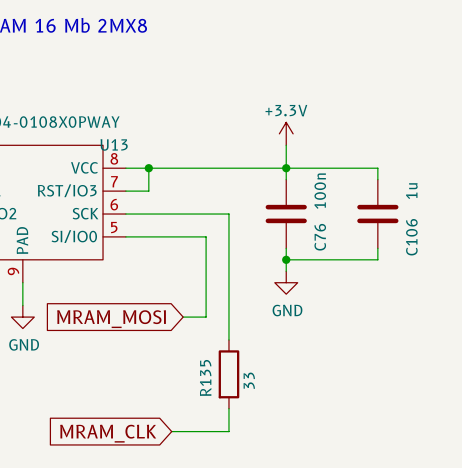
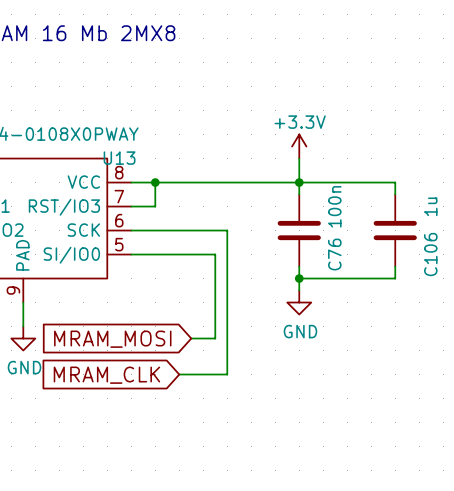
wire: (217, 214) (228, 214) (228, 339) -> (227, 230) (227, 374) (179, 374)
R135: 33 (228, 374) -> none
wire: (228, 408) (228, 431) (171, 431) -> none
global label position: MRAM_CLK (108, 433) -> MRAM_CLK (106, 375)

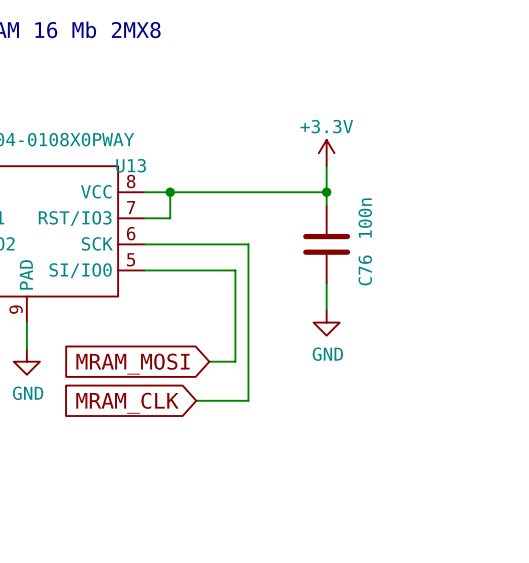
wire: (299, 182) (395, 182) (395, 194) -> none
C106: 1u (395, 230) -> none
wire: (395, 266) (395, 278) (299, 278) -> none
junction: (299, 278) -> none

